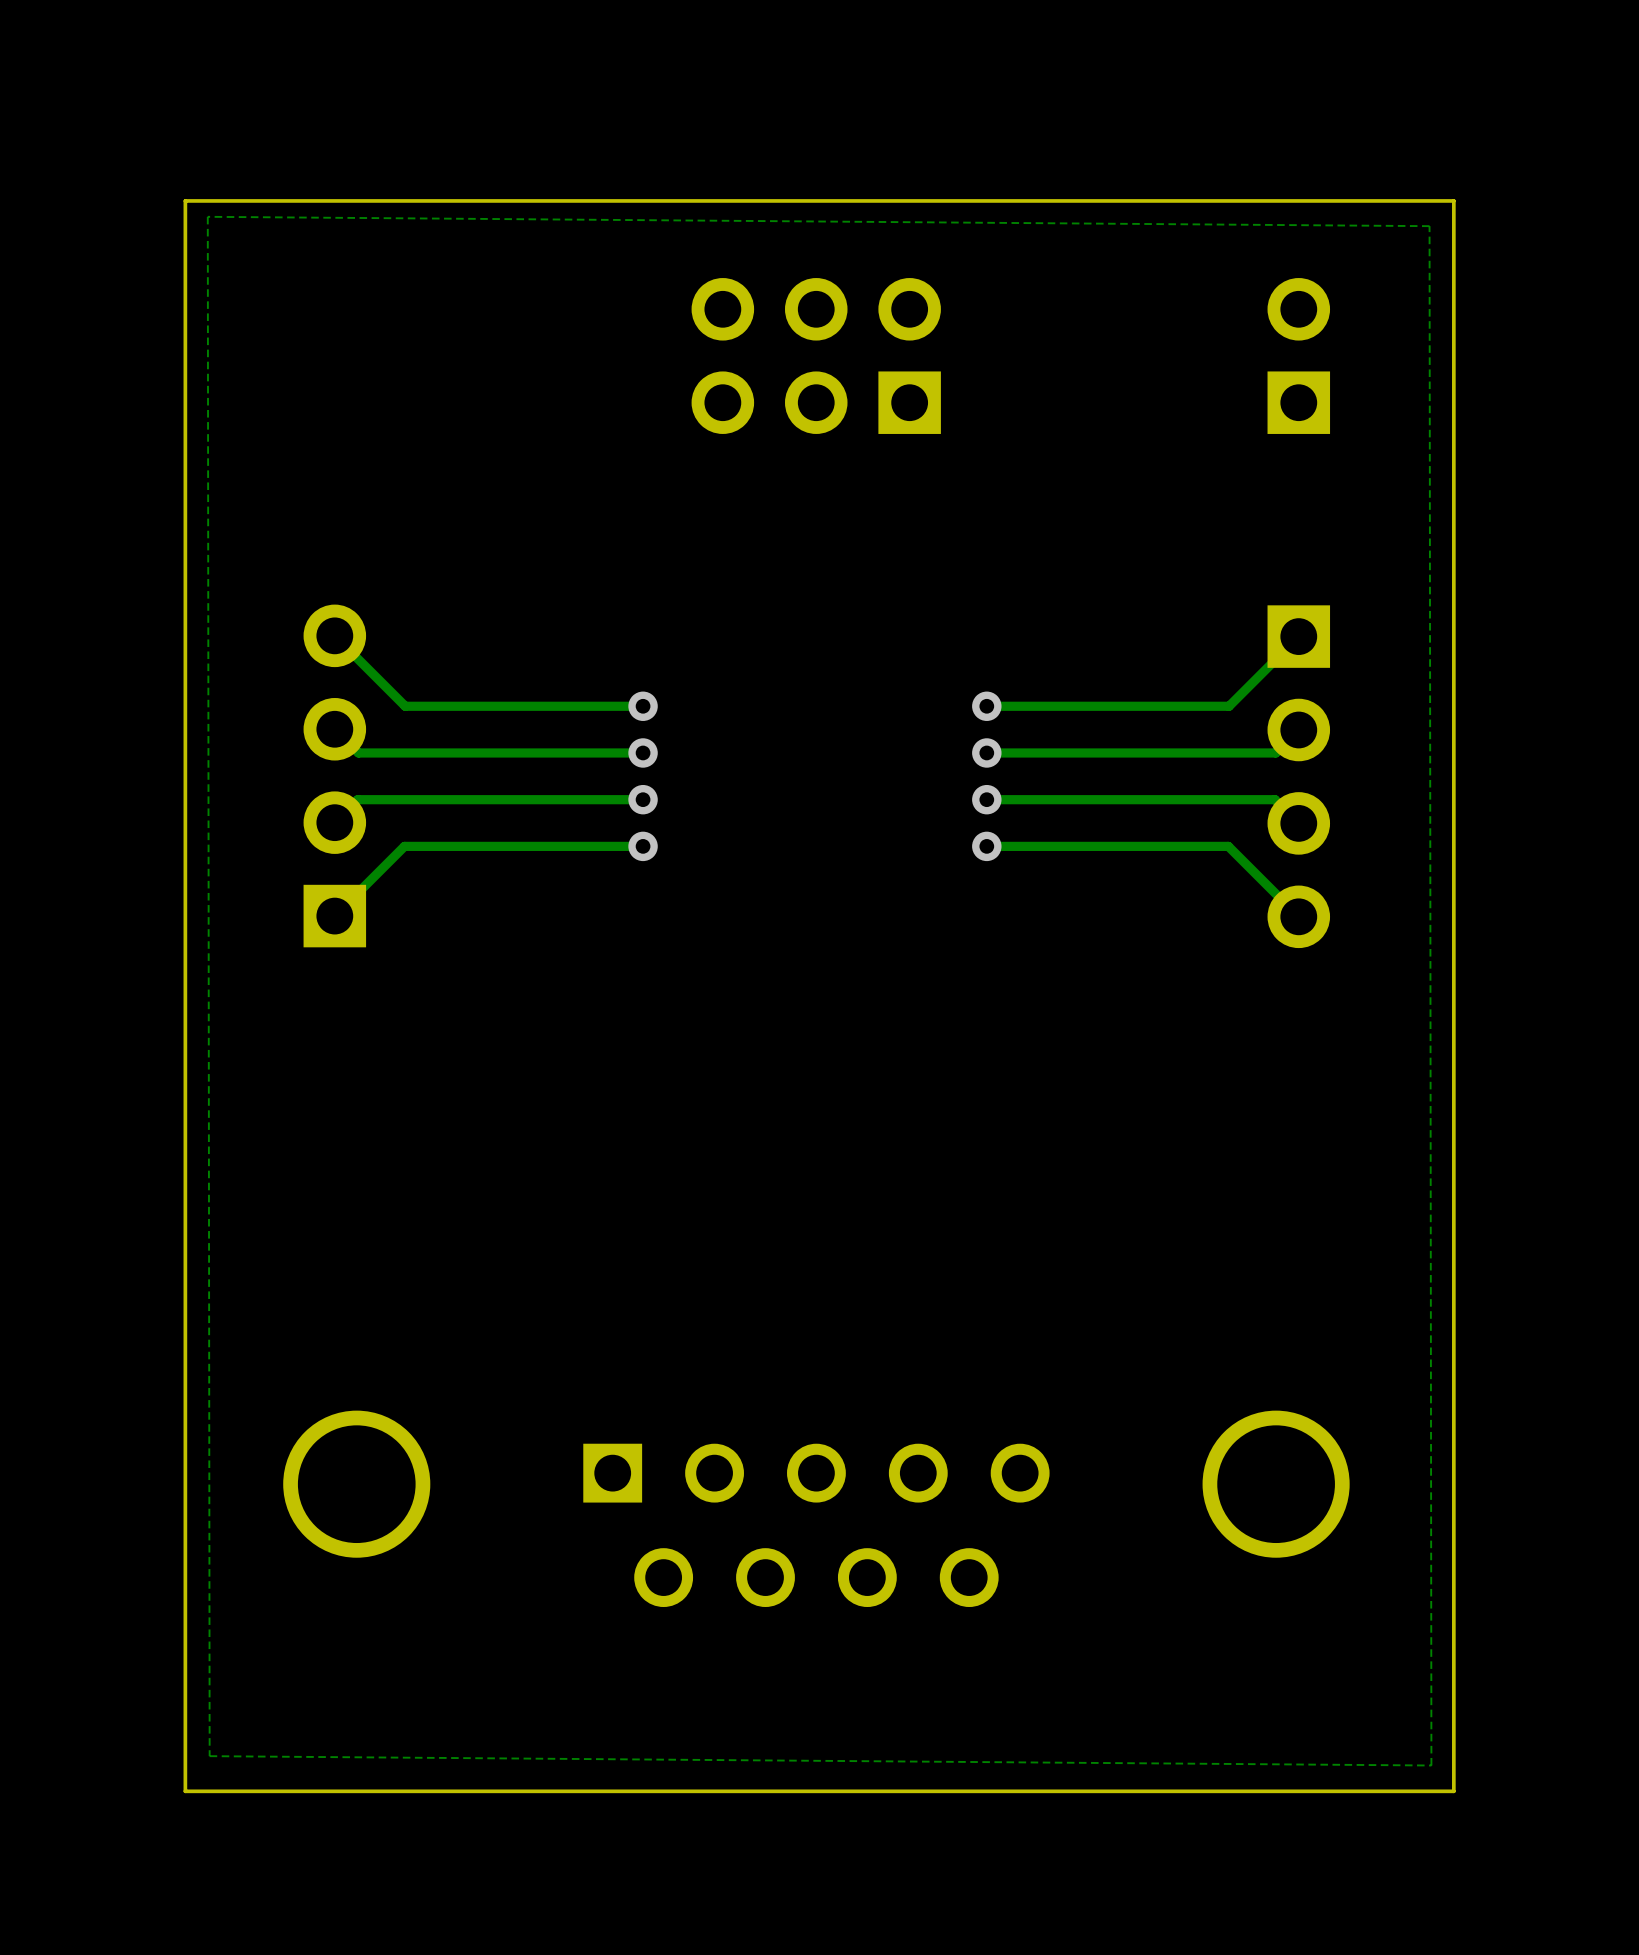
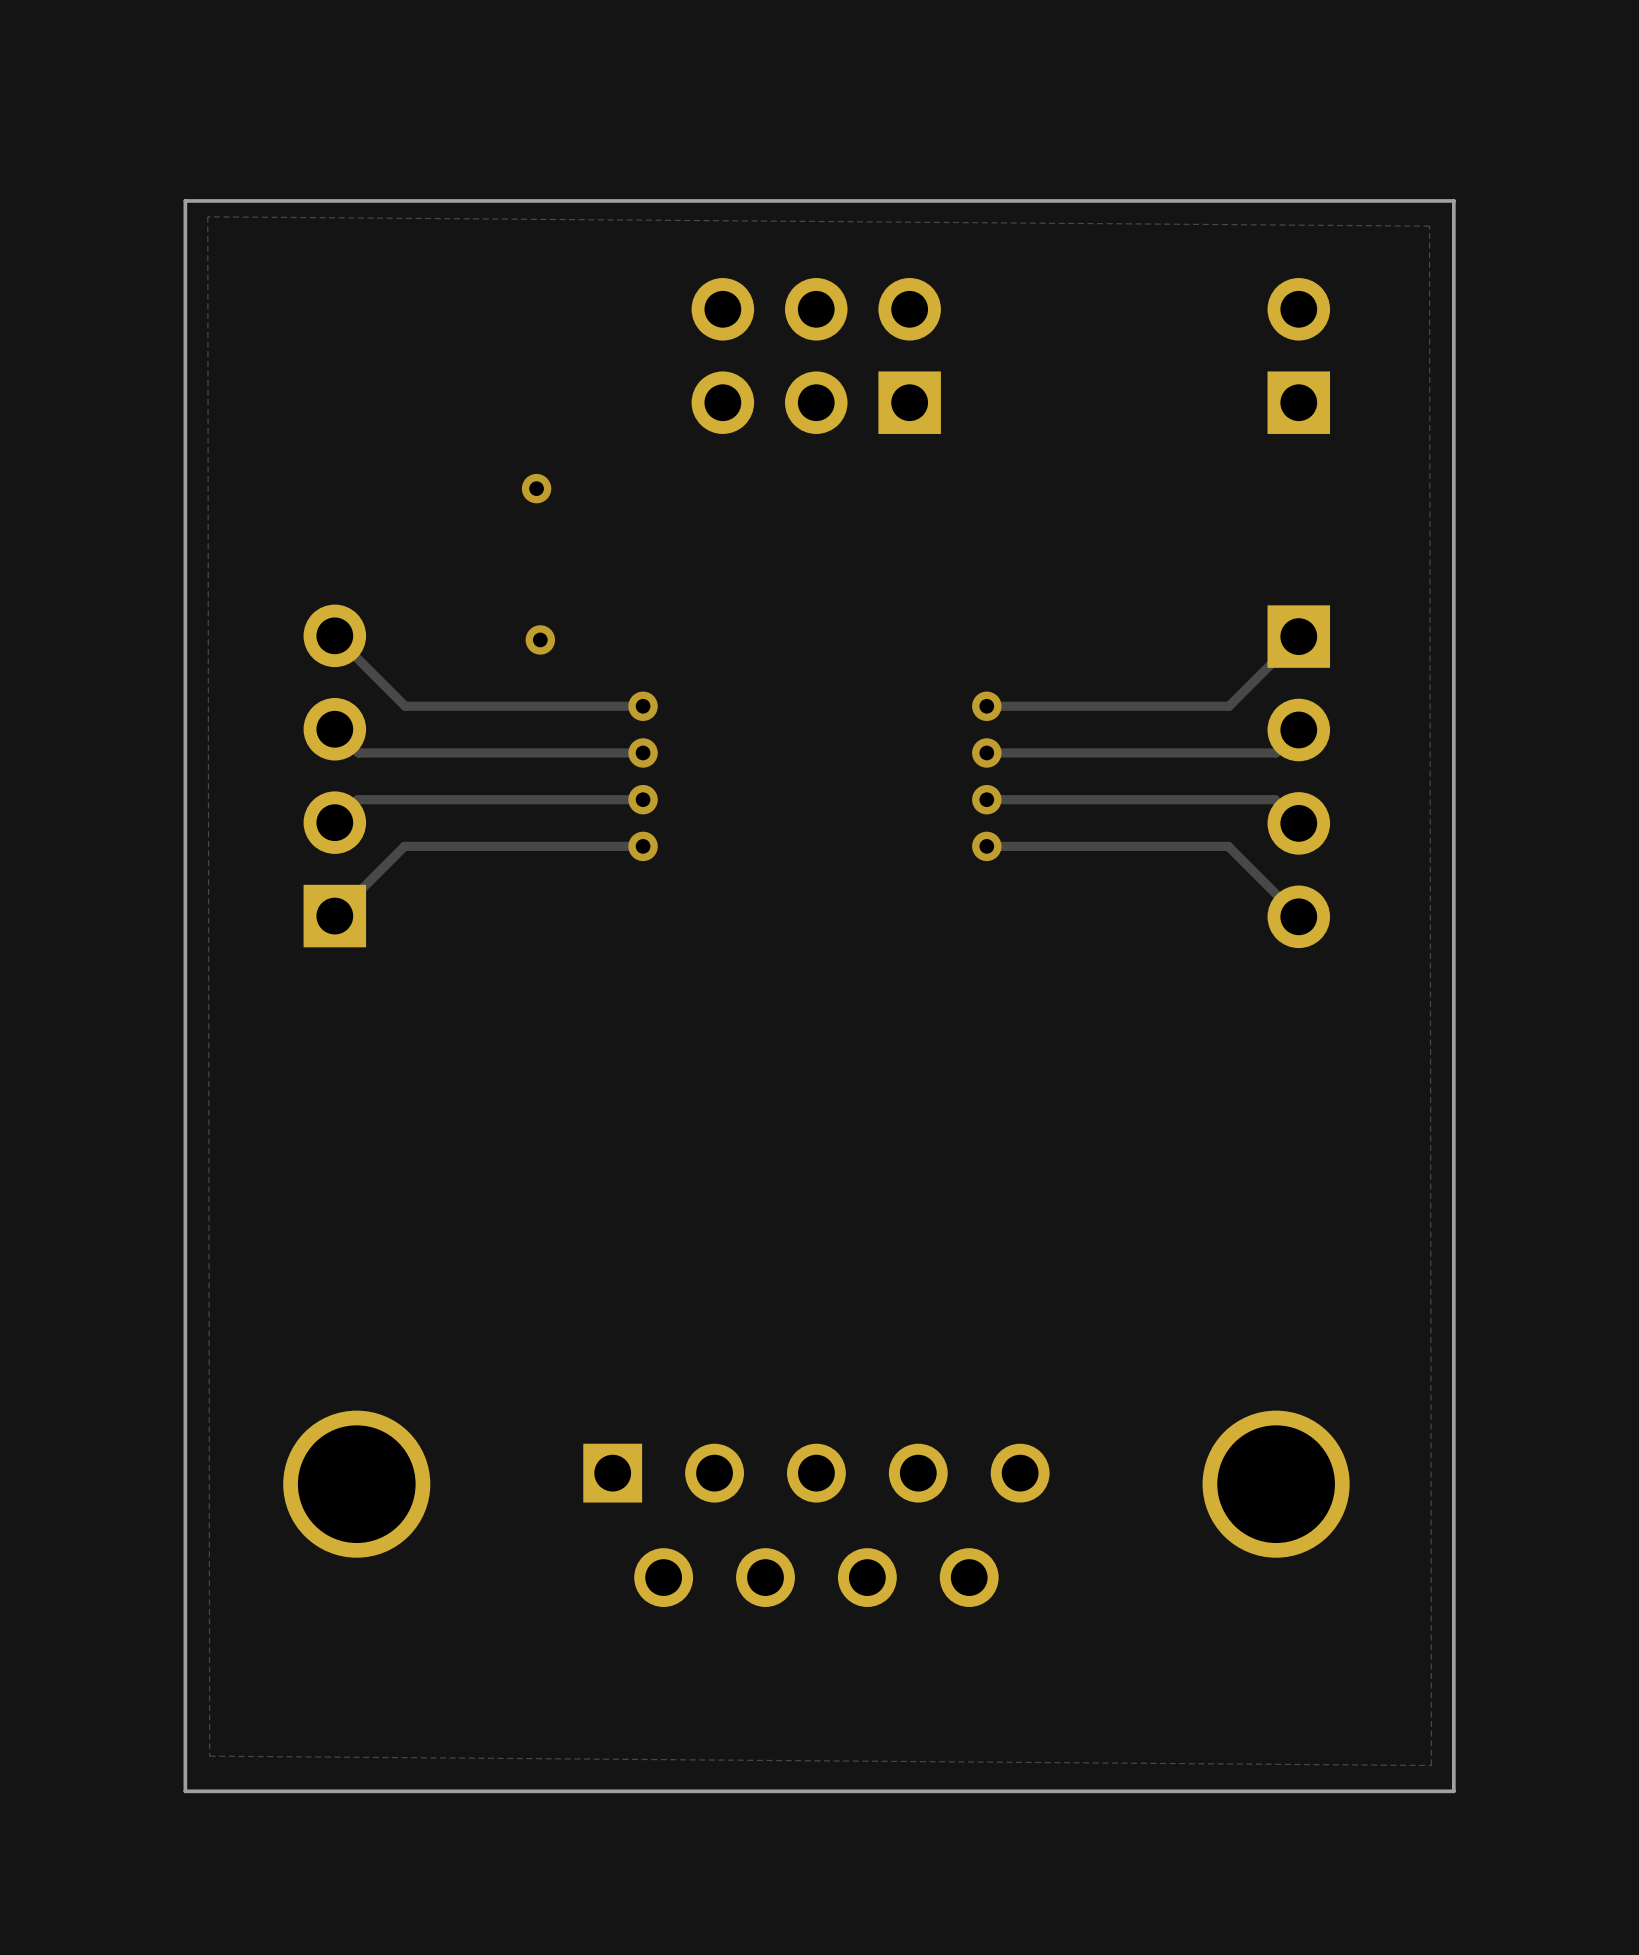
via: none -> (536, 488)
via: none -> (540, 639)

